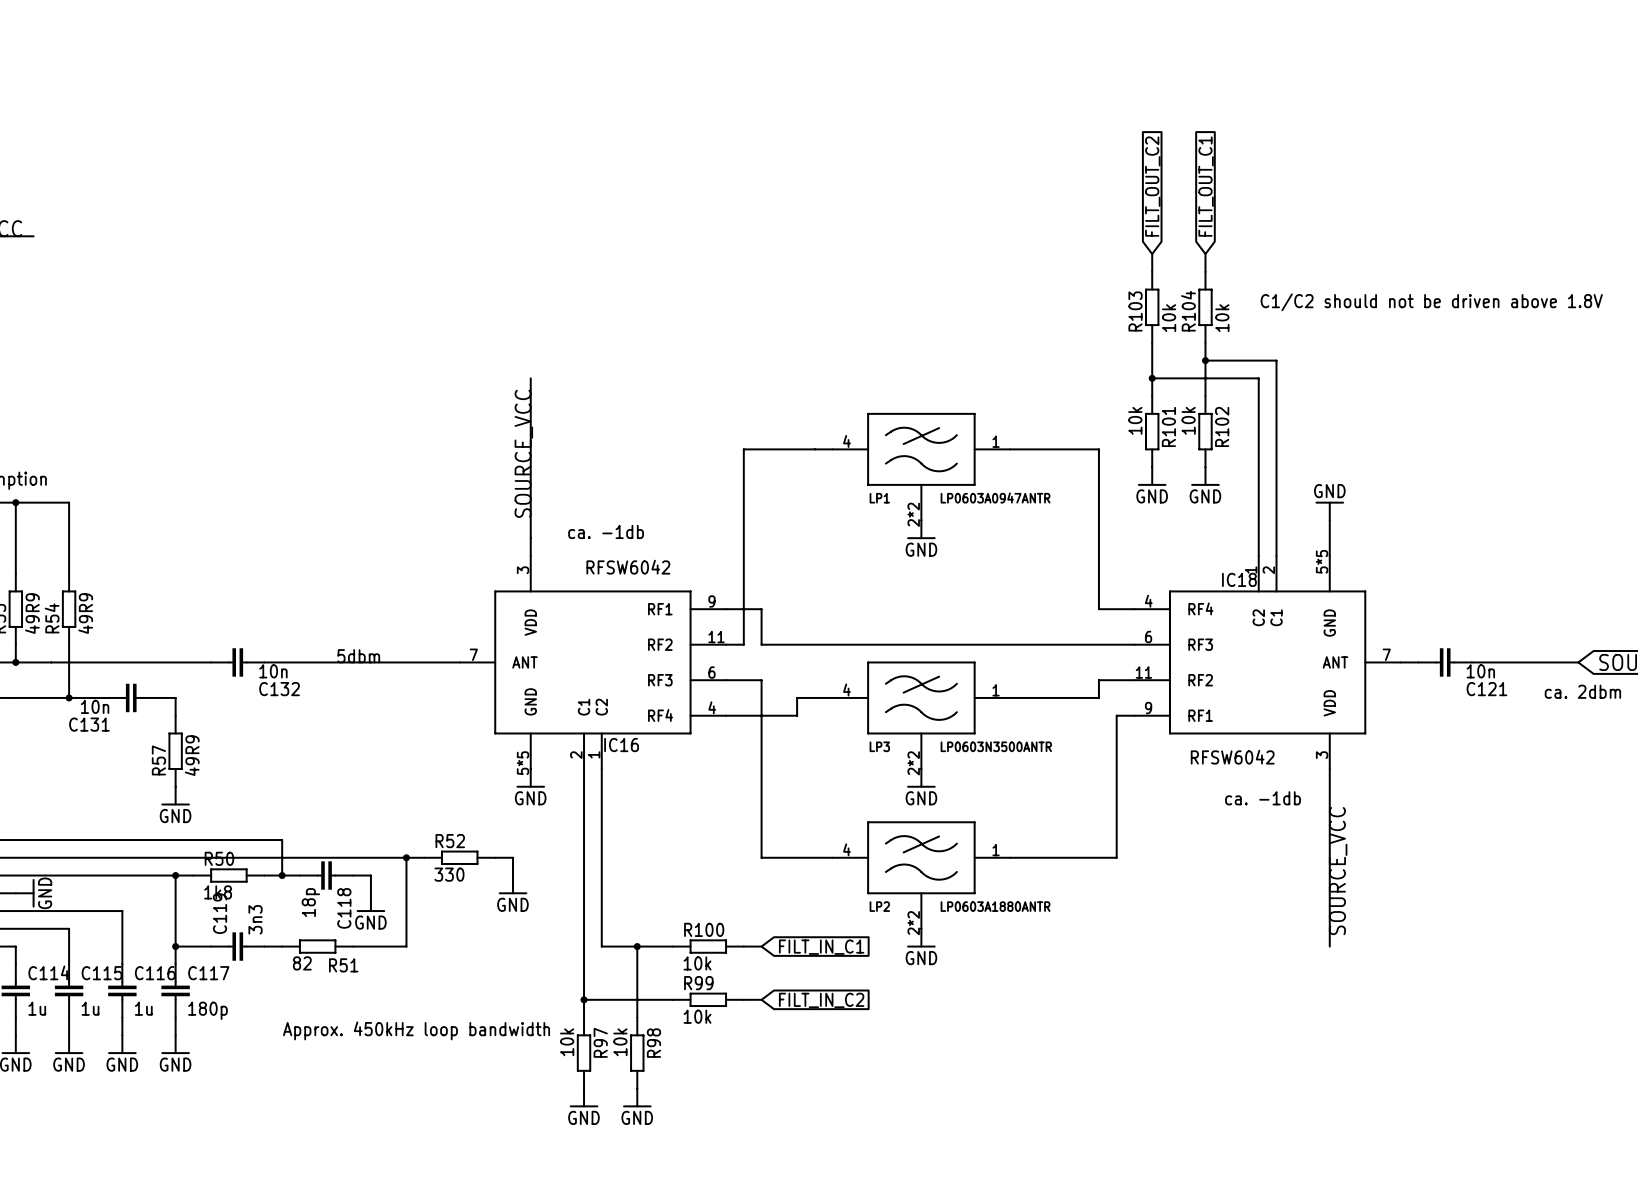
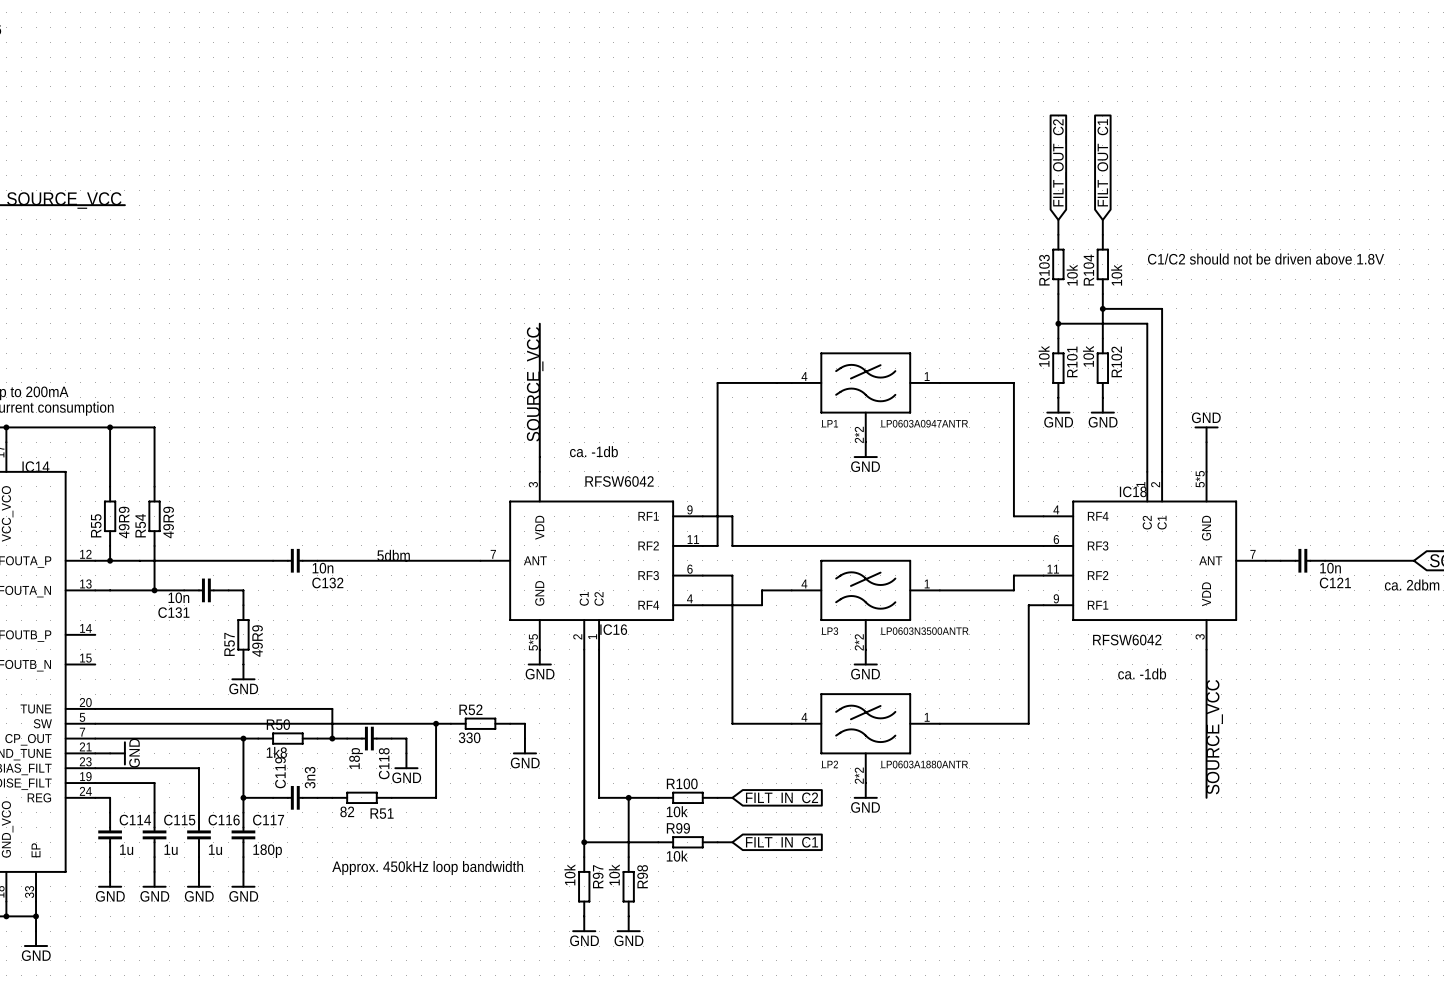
global label: FILT_IN_C1 (821, 947) -> FILT_IN_C2 (782, 799)
global label: FILT_IN_C2 (821, 1000) -> FILT_IN_C1 (782, 843)

